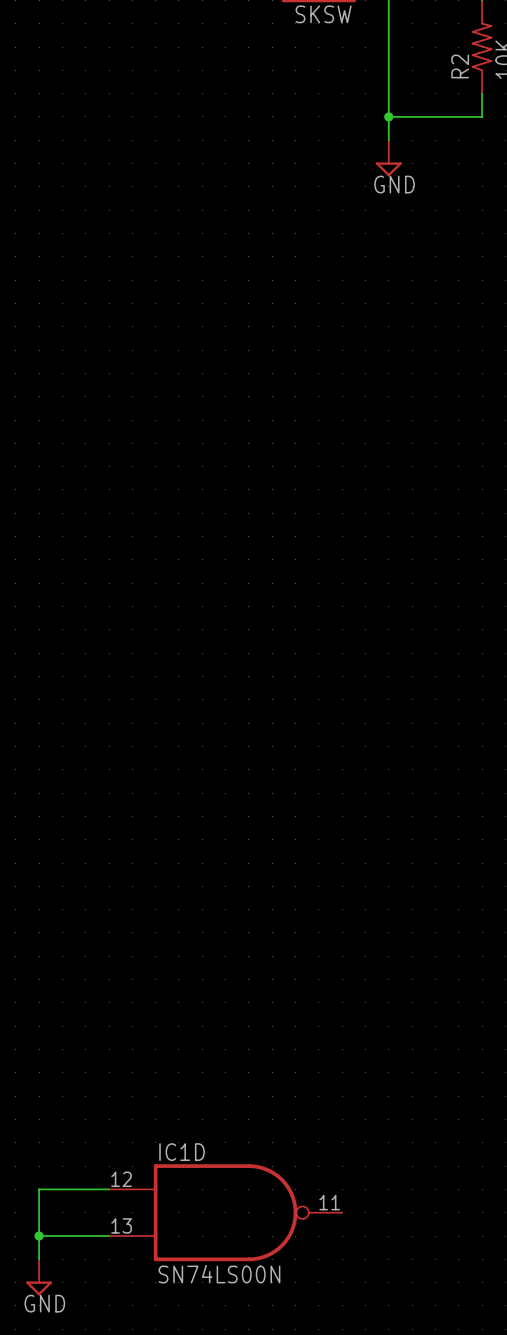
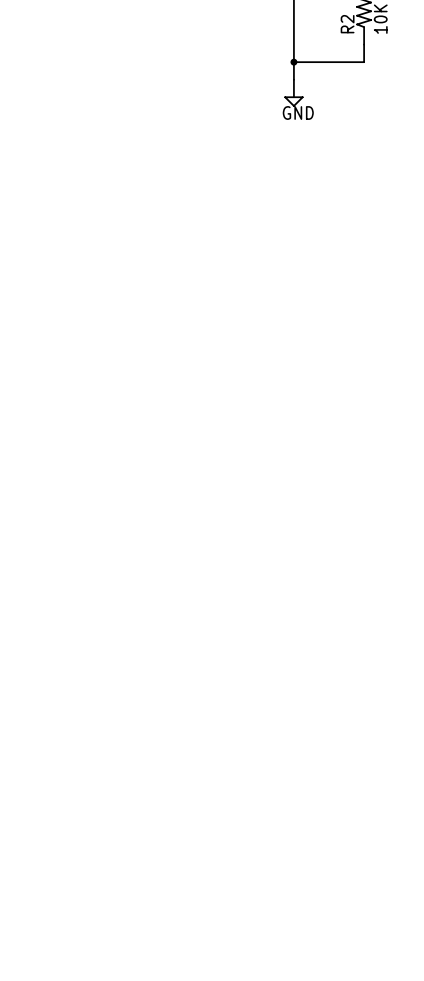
wire: (109, 1189) (39, 1189) (39, 1259) -> none
IC1D: SN74LS00N (225, 1212) -> none
wire: (39, 1236) (109, 1236) -> none
junction: (39, 1236) -> none
power symbol: GND (39, 1277) -> none

